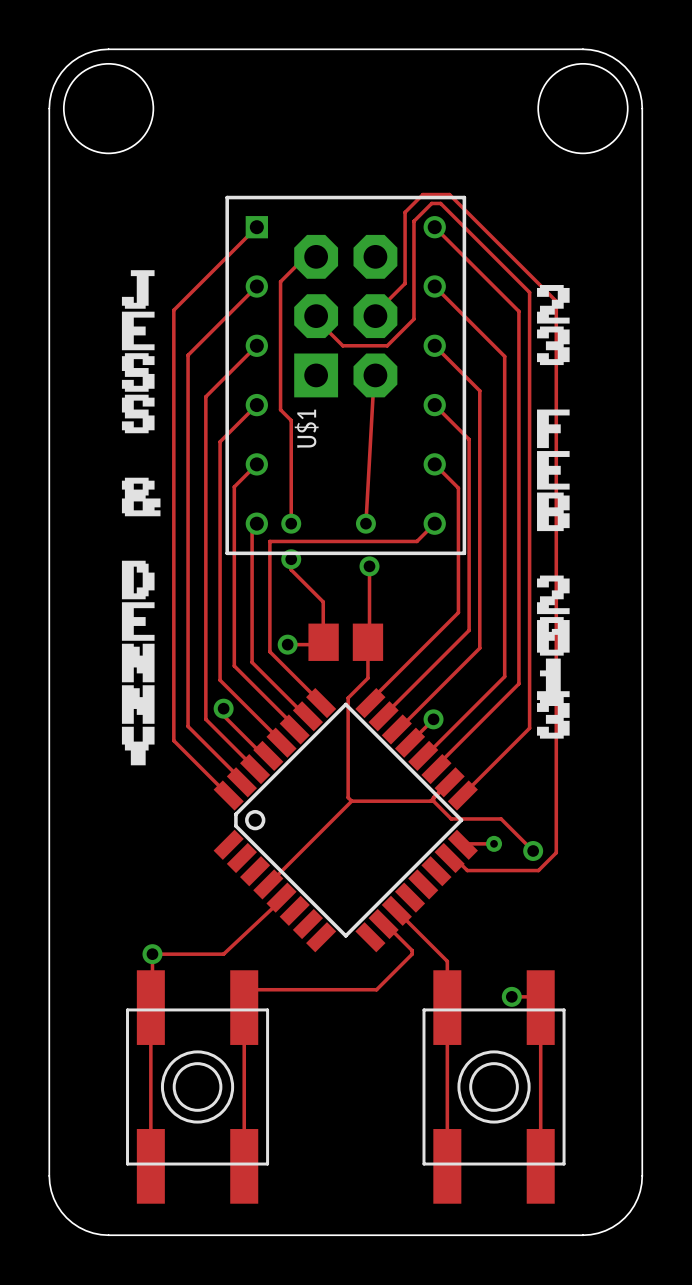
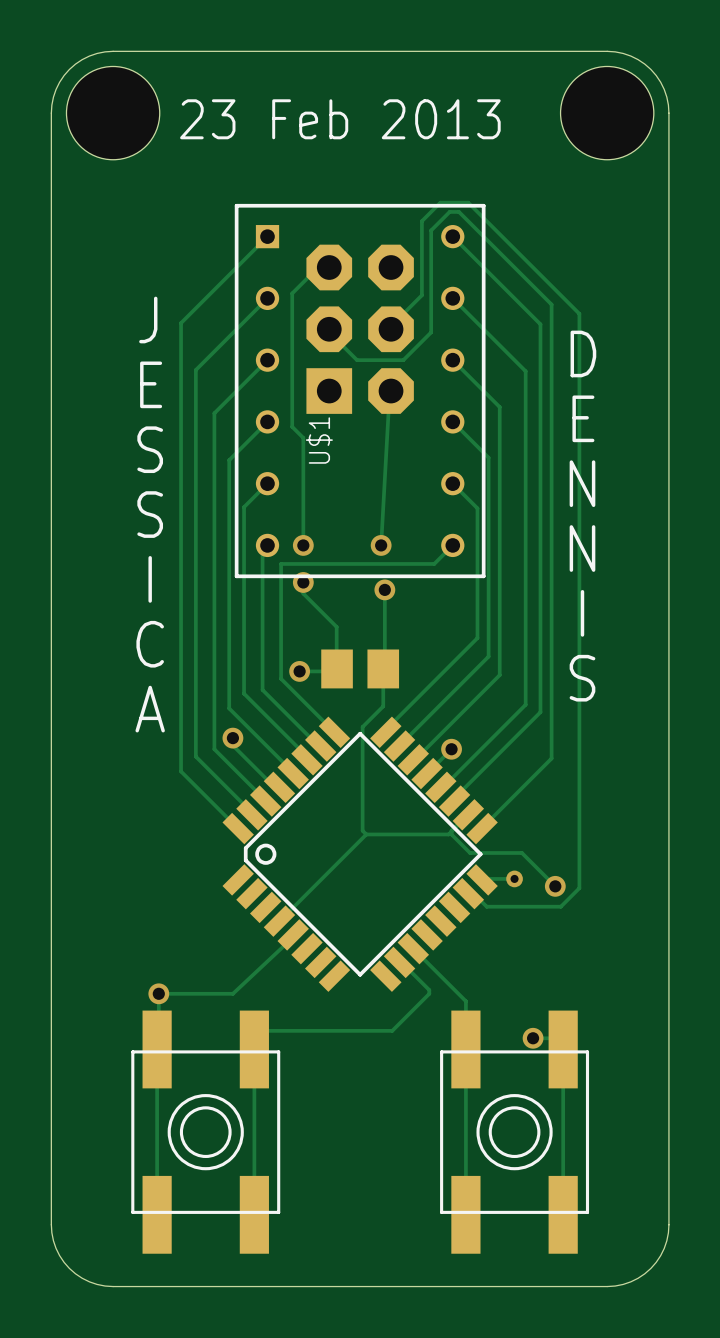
text: none -> 23 Feb 2013 (340, 119)
drawing: [121, 270, 161, 766] -> none
drawing: [537, 285, 570, 739] -> none
text: none -> J (148, 320)
text: none -> D (583, 353)
text: none -> E (151, 384)
text: none -> E (583, 418)
text: none -> S (150, 449)
text: none -> N (582, 483)
text: none -> S (150, 514)
text: none -> N (582, 548)
text: none -> I (150, 579)
text: none -> I (582, 613)
text: none -> C (150, 644)
text: none -> S (582, 678)
text: none -> A (150, 709)

